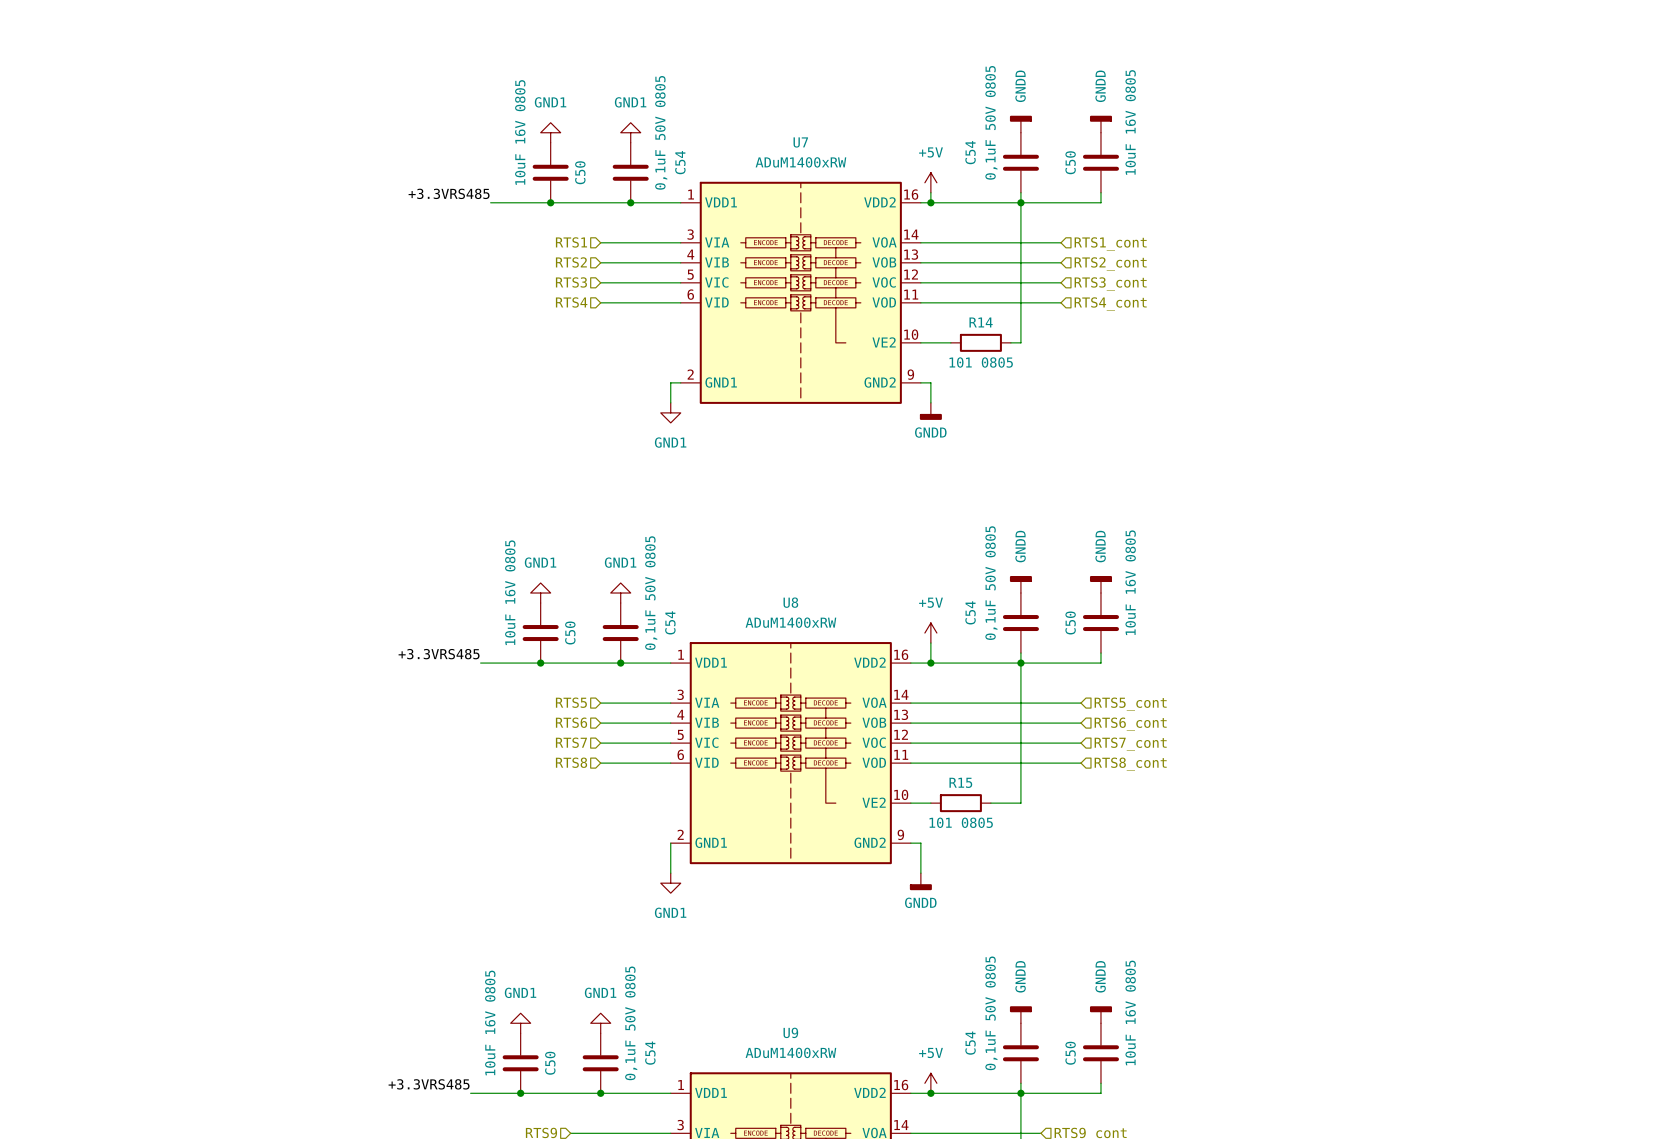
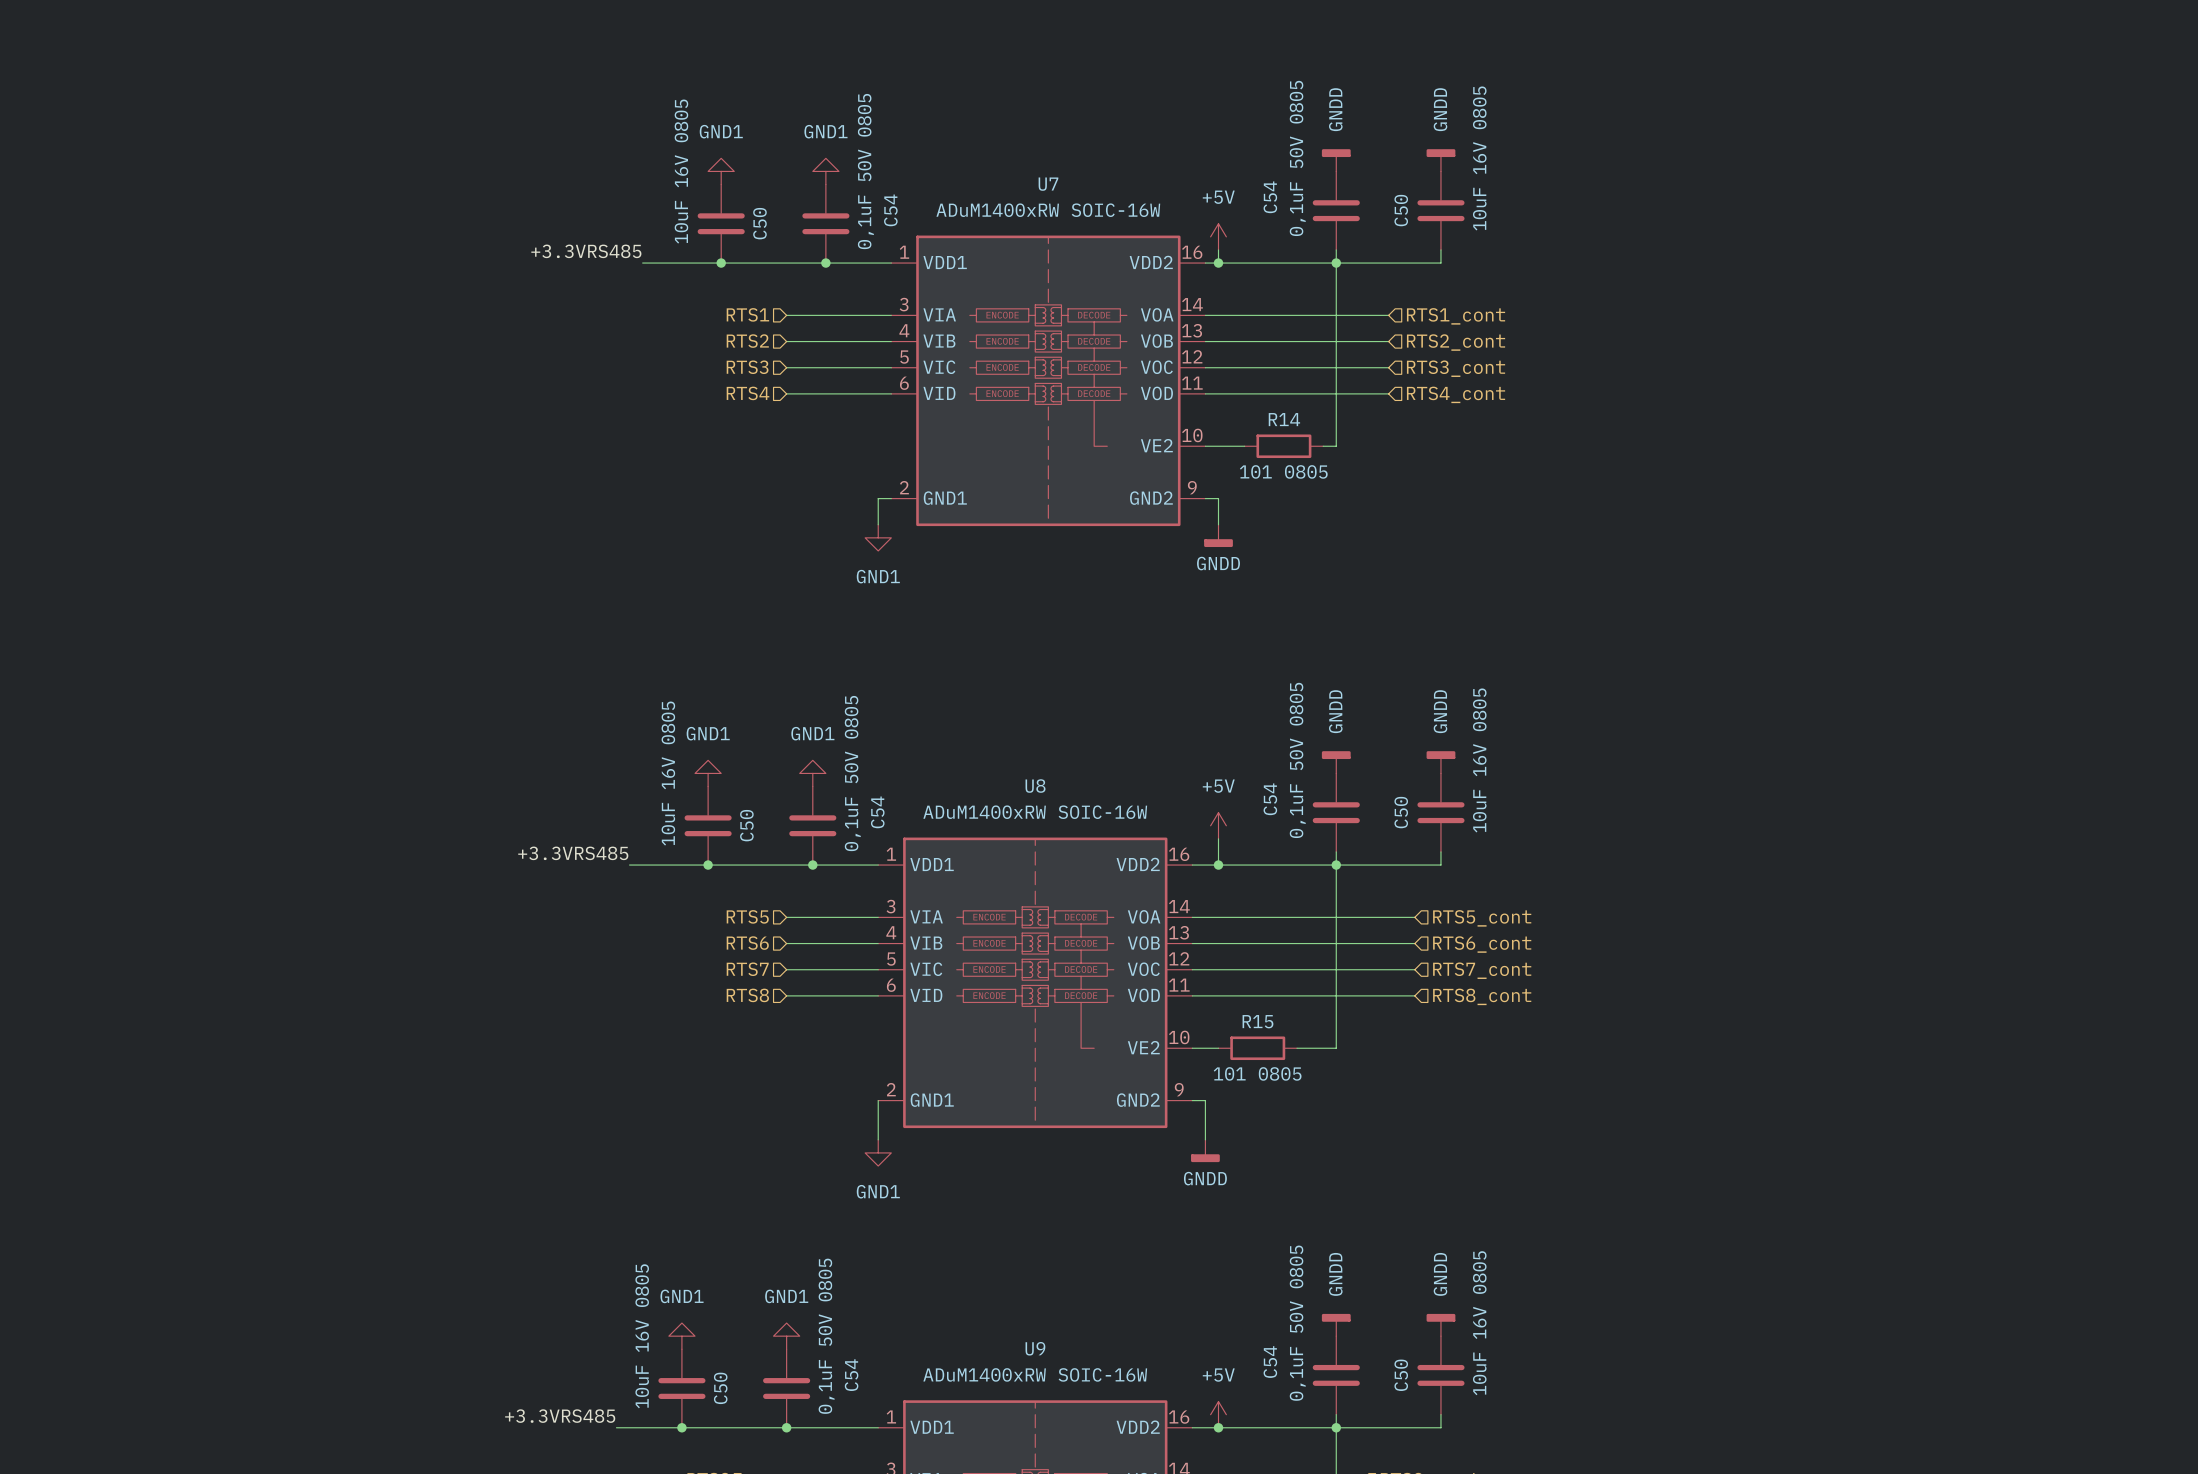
U7 value: ADuM1400xRW (800, 162) -> ADuM1400xRW SOIC-16W (1048, 210)
U8 value: ADuM1400xRW (790, 622) -> ADuM1400xRW SOIC-16W (1035, 812)
U9 value: ADuM1400xRW (790, 1052) -> ADuM1400xRW SOIC-16W (1035, 1374)

